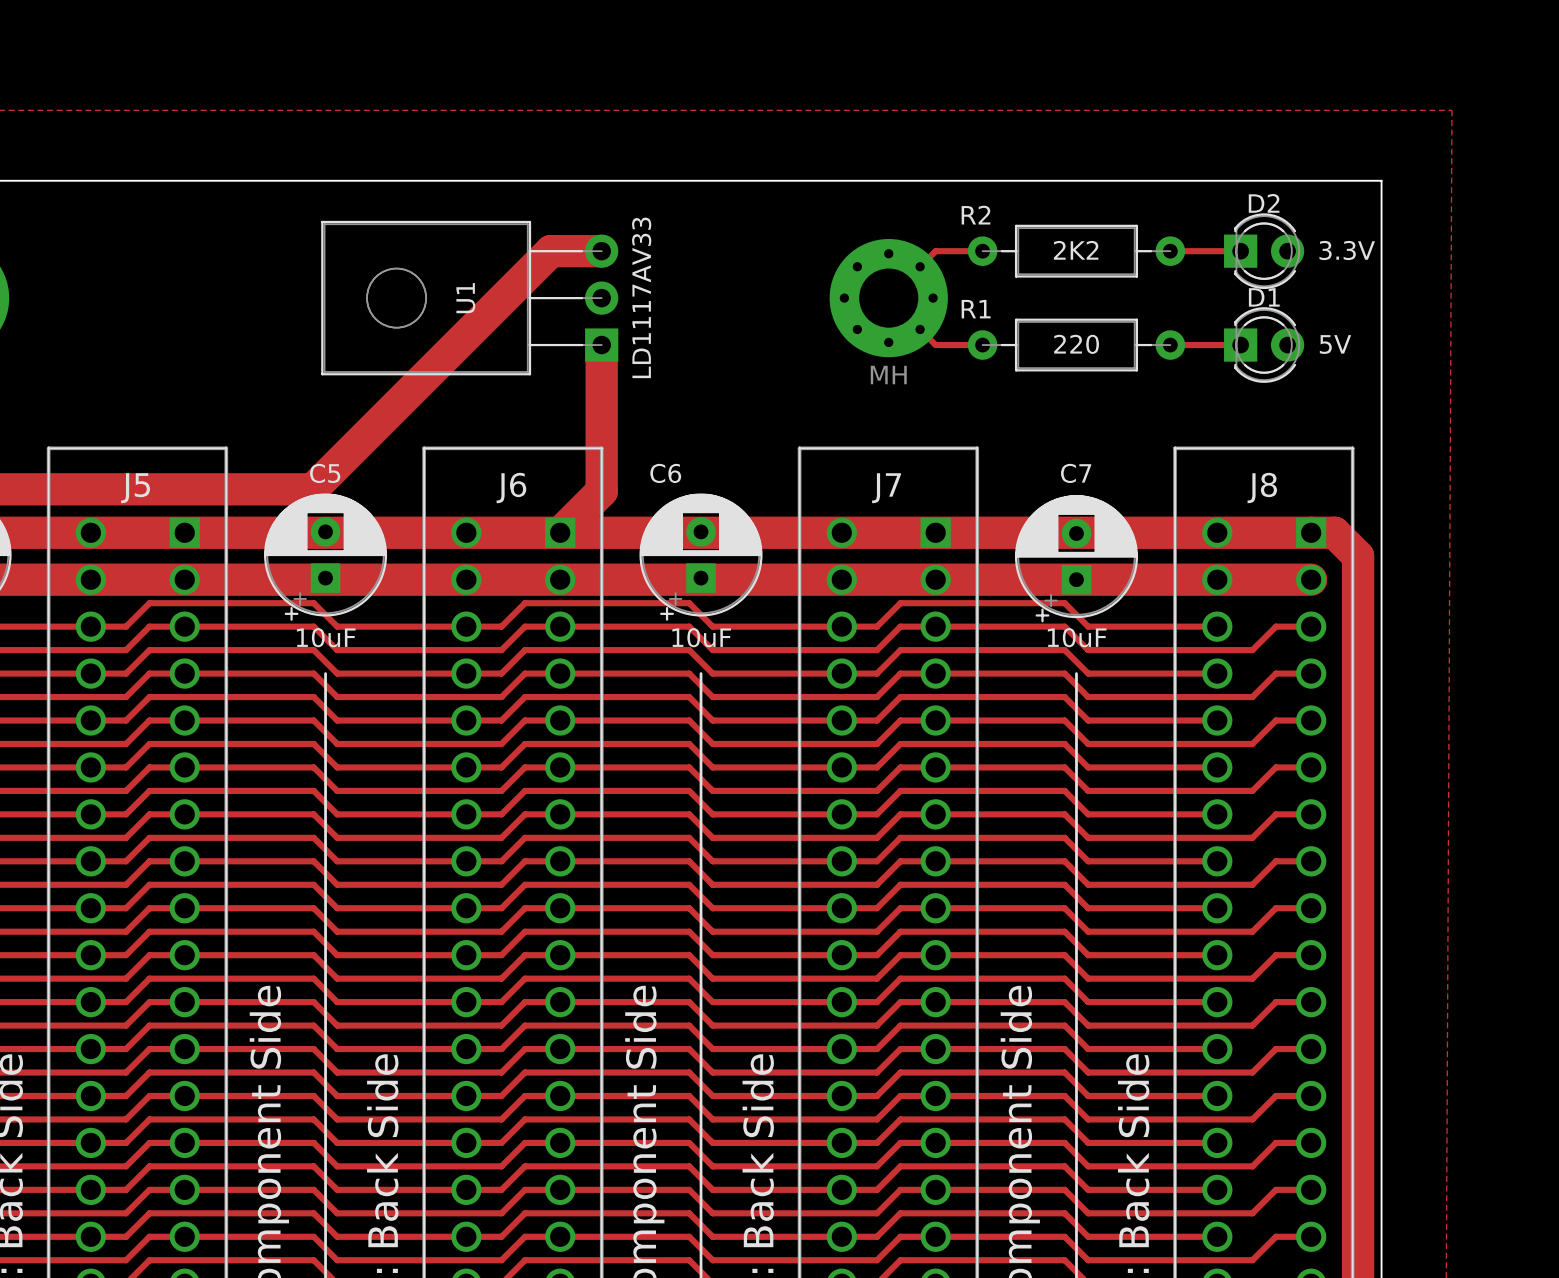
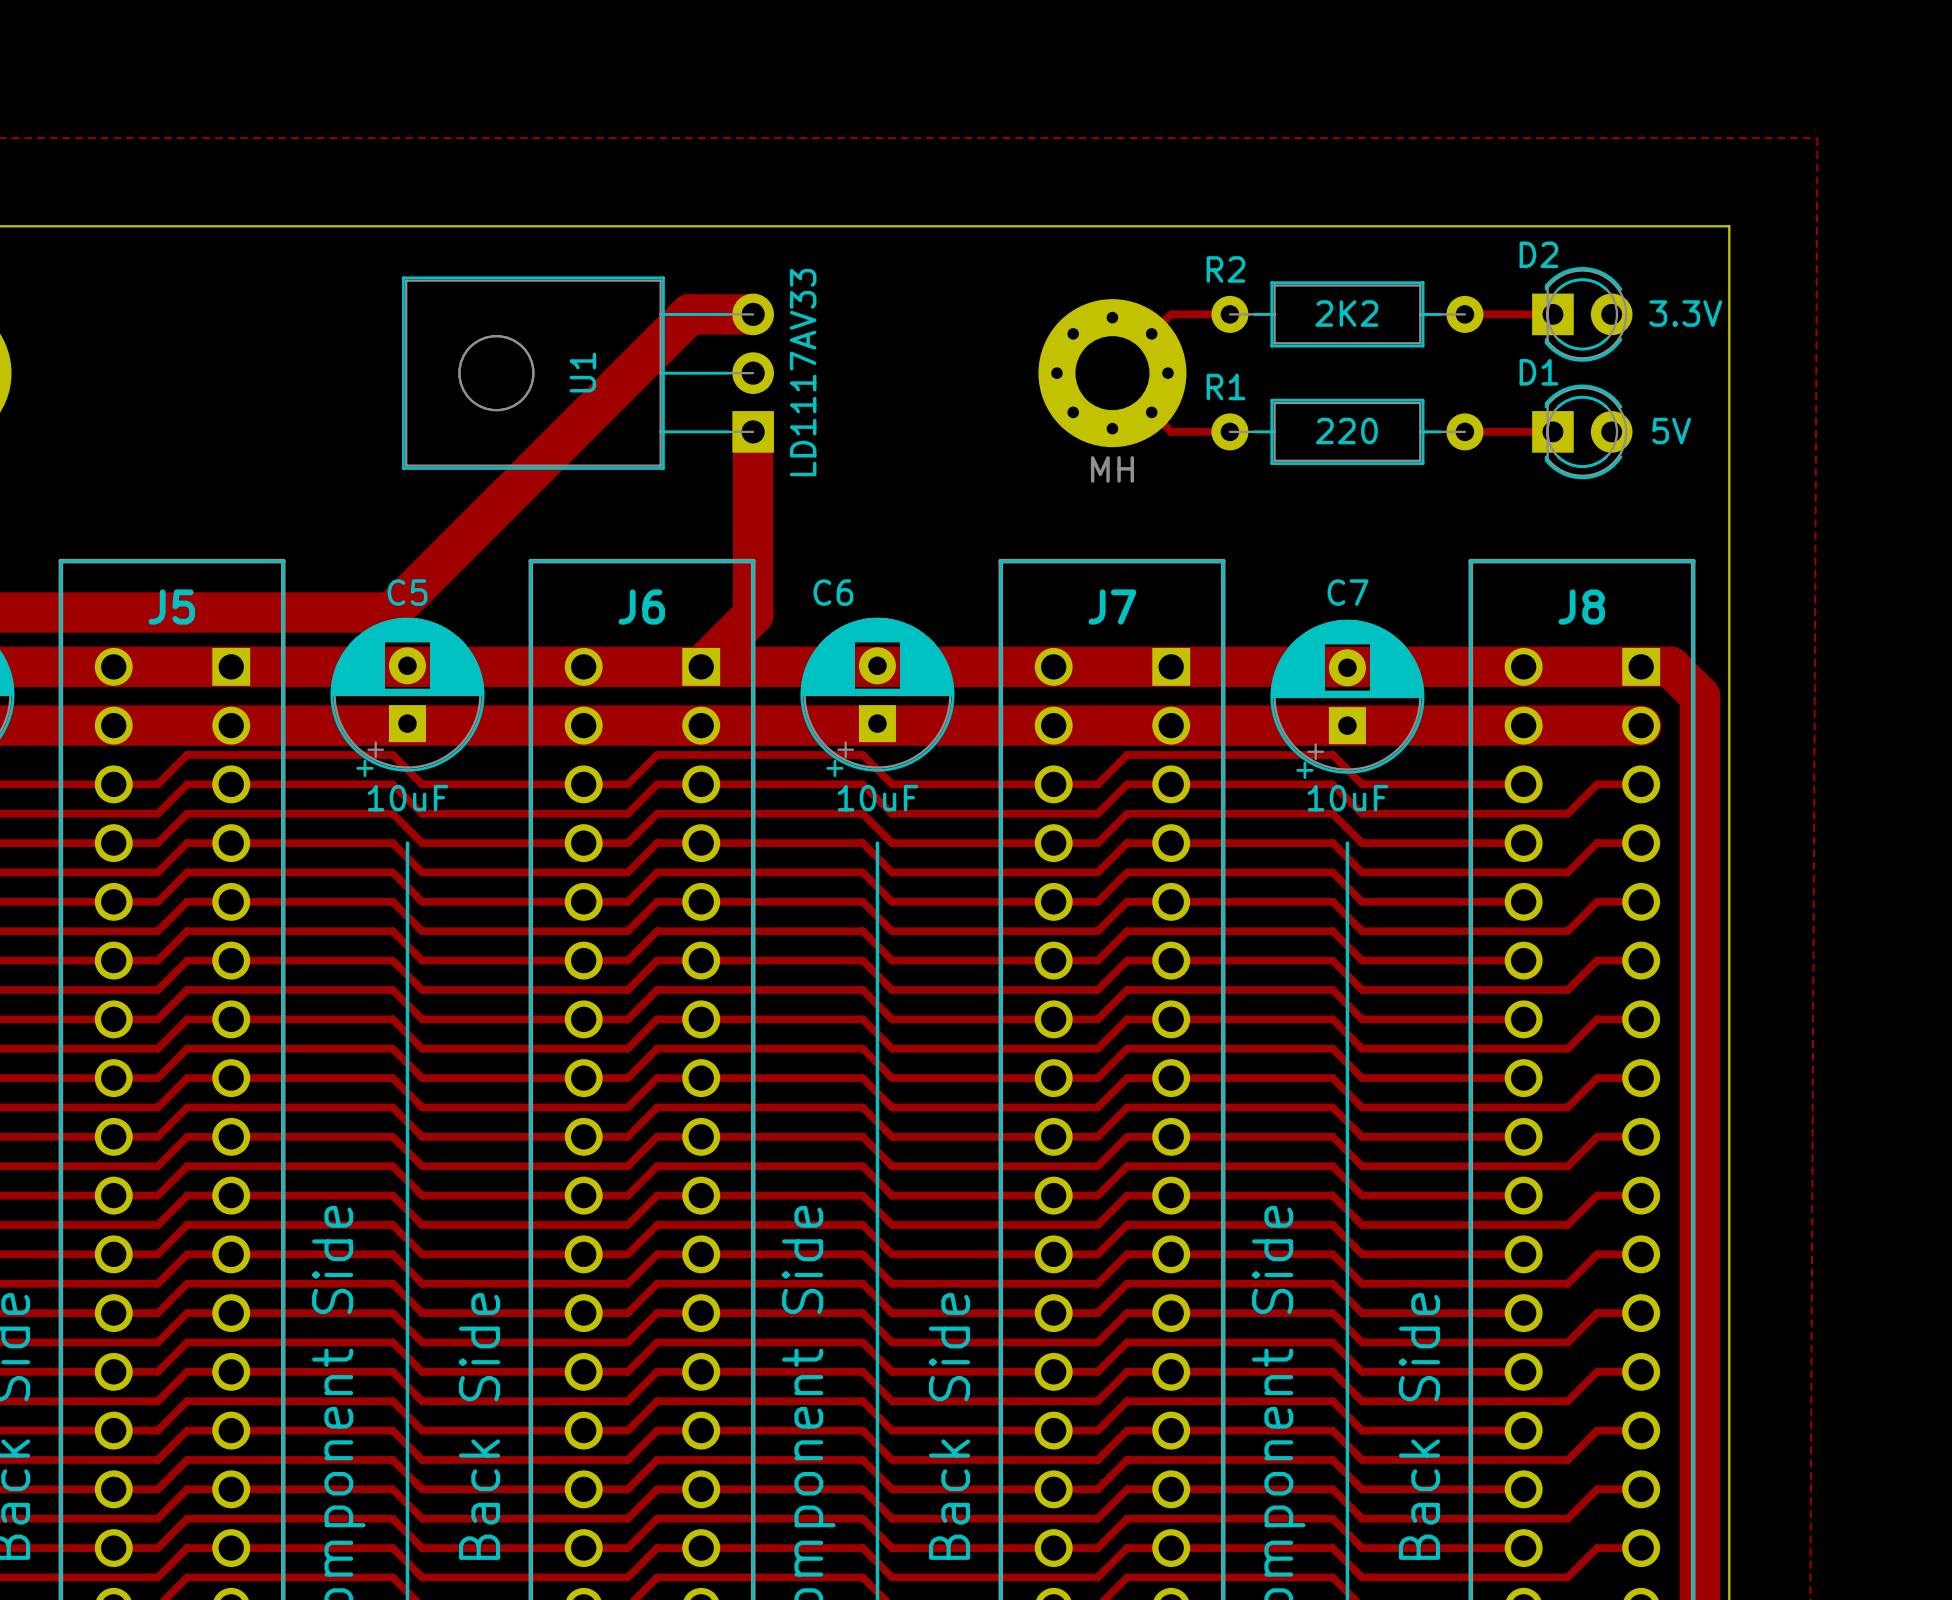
D2 name position: D2 (1264, 203) -> D2 (1538, 254)
D1 name position: D1 (1264, 297) -> D1 (1538, 372)

